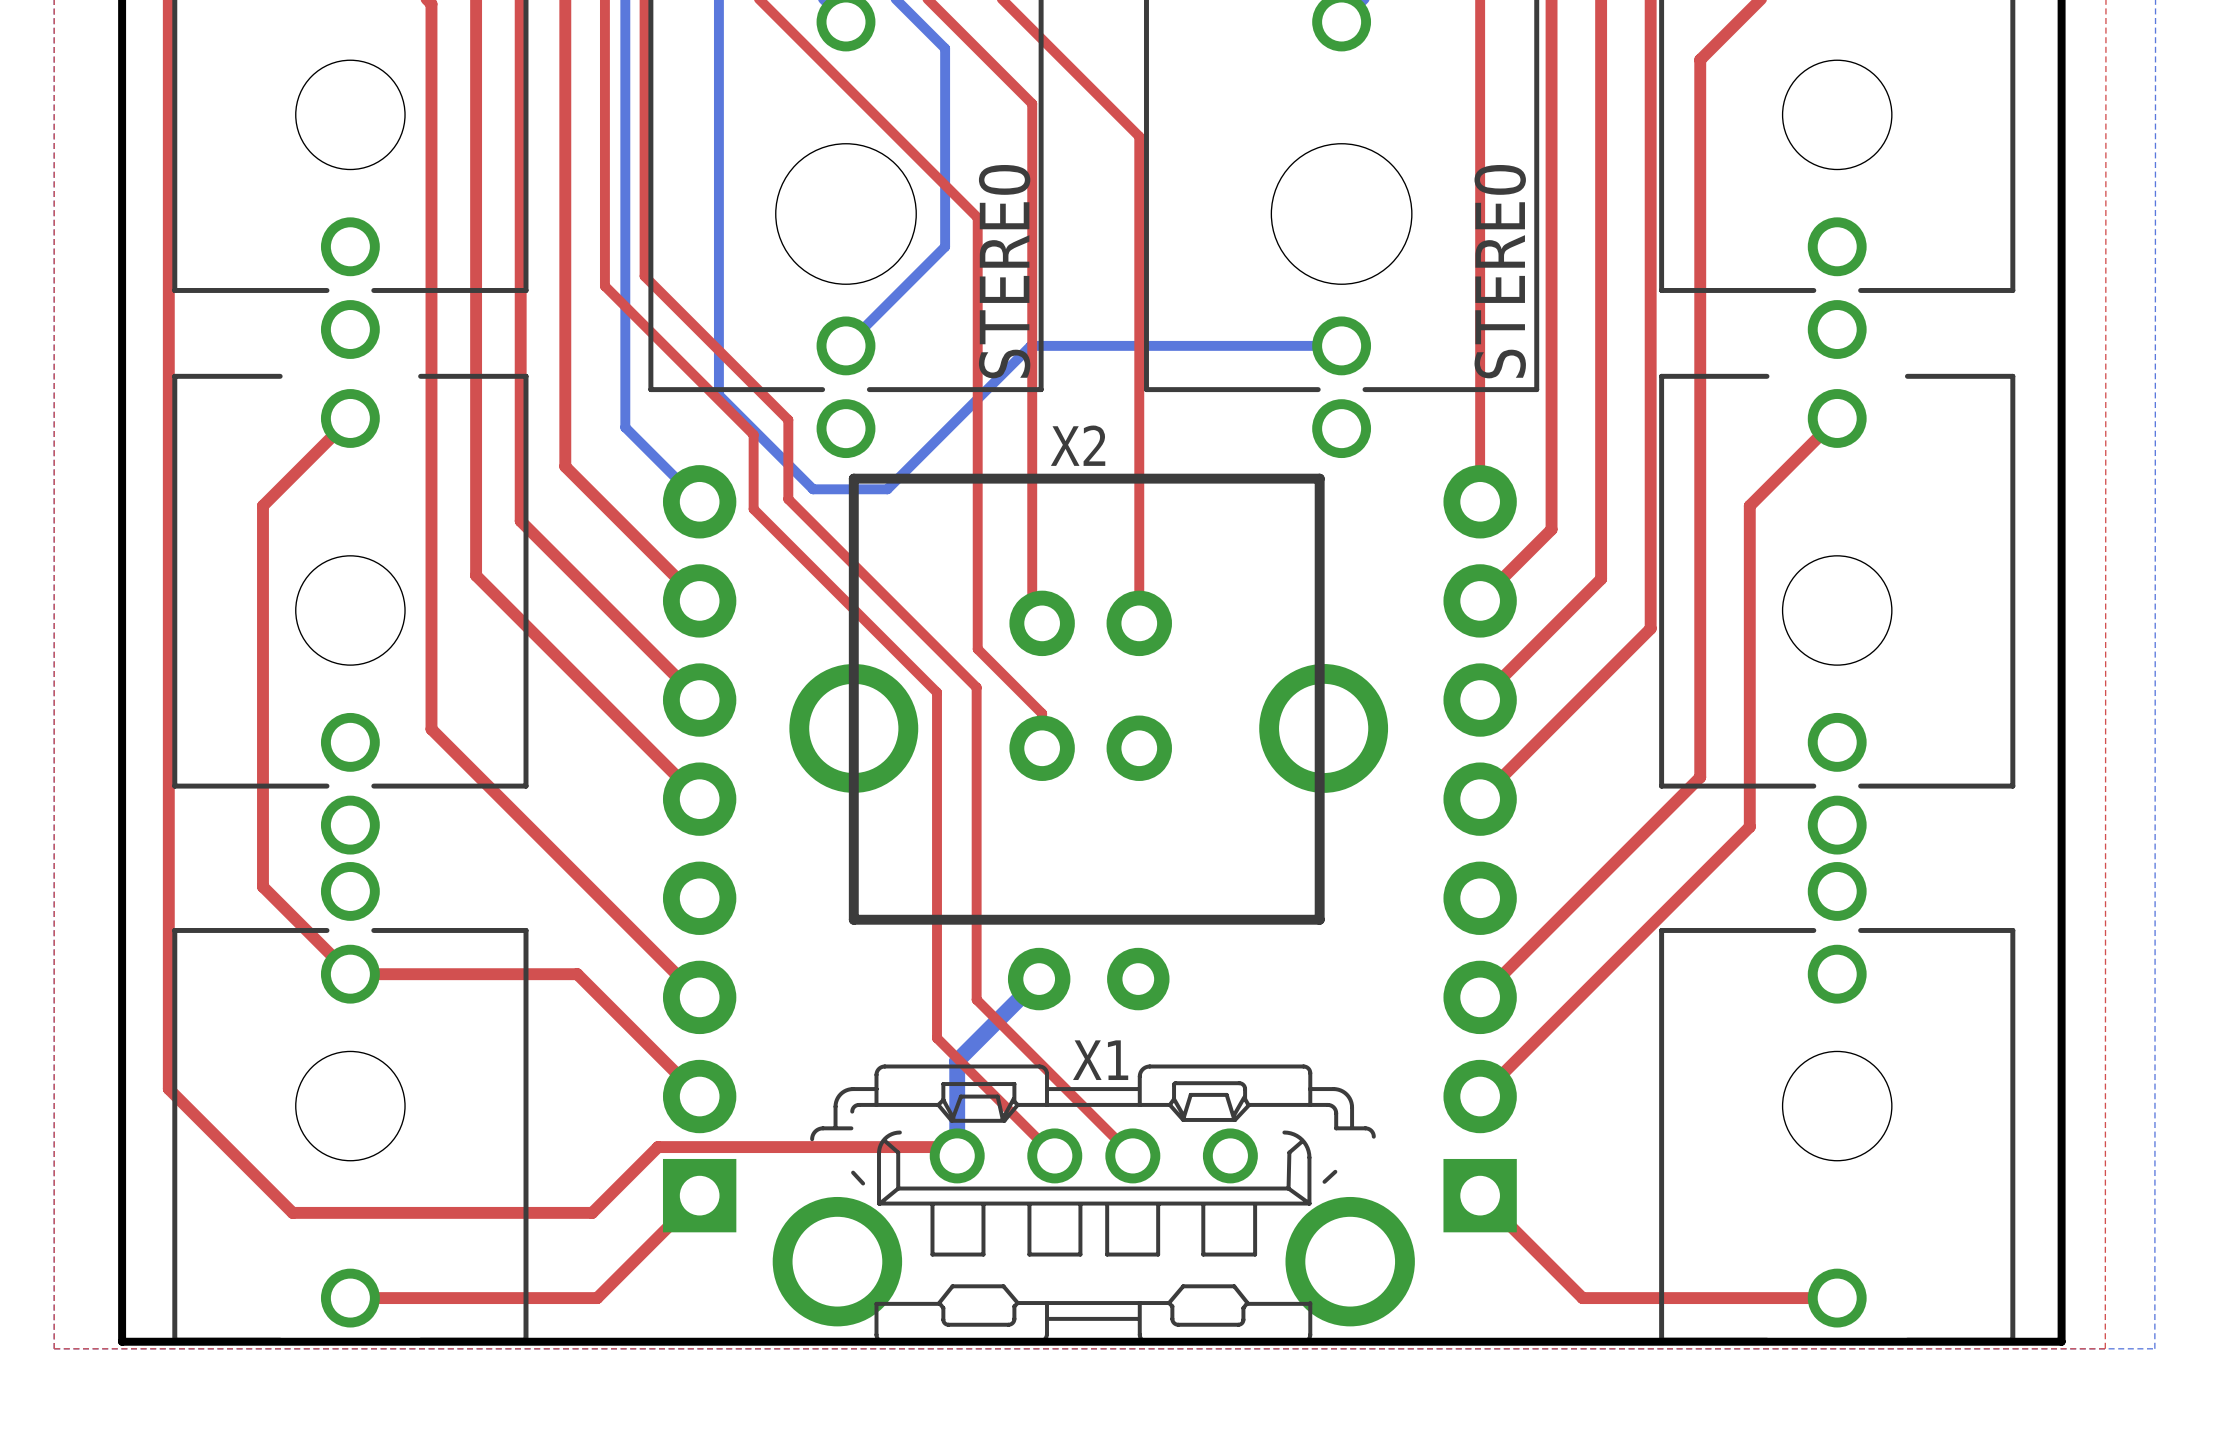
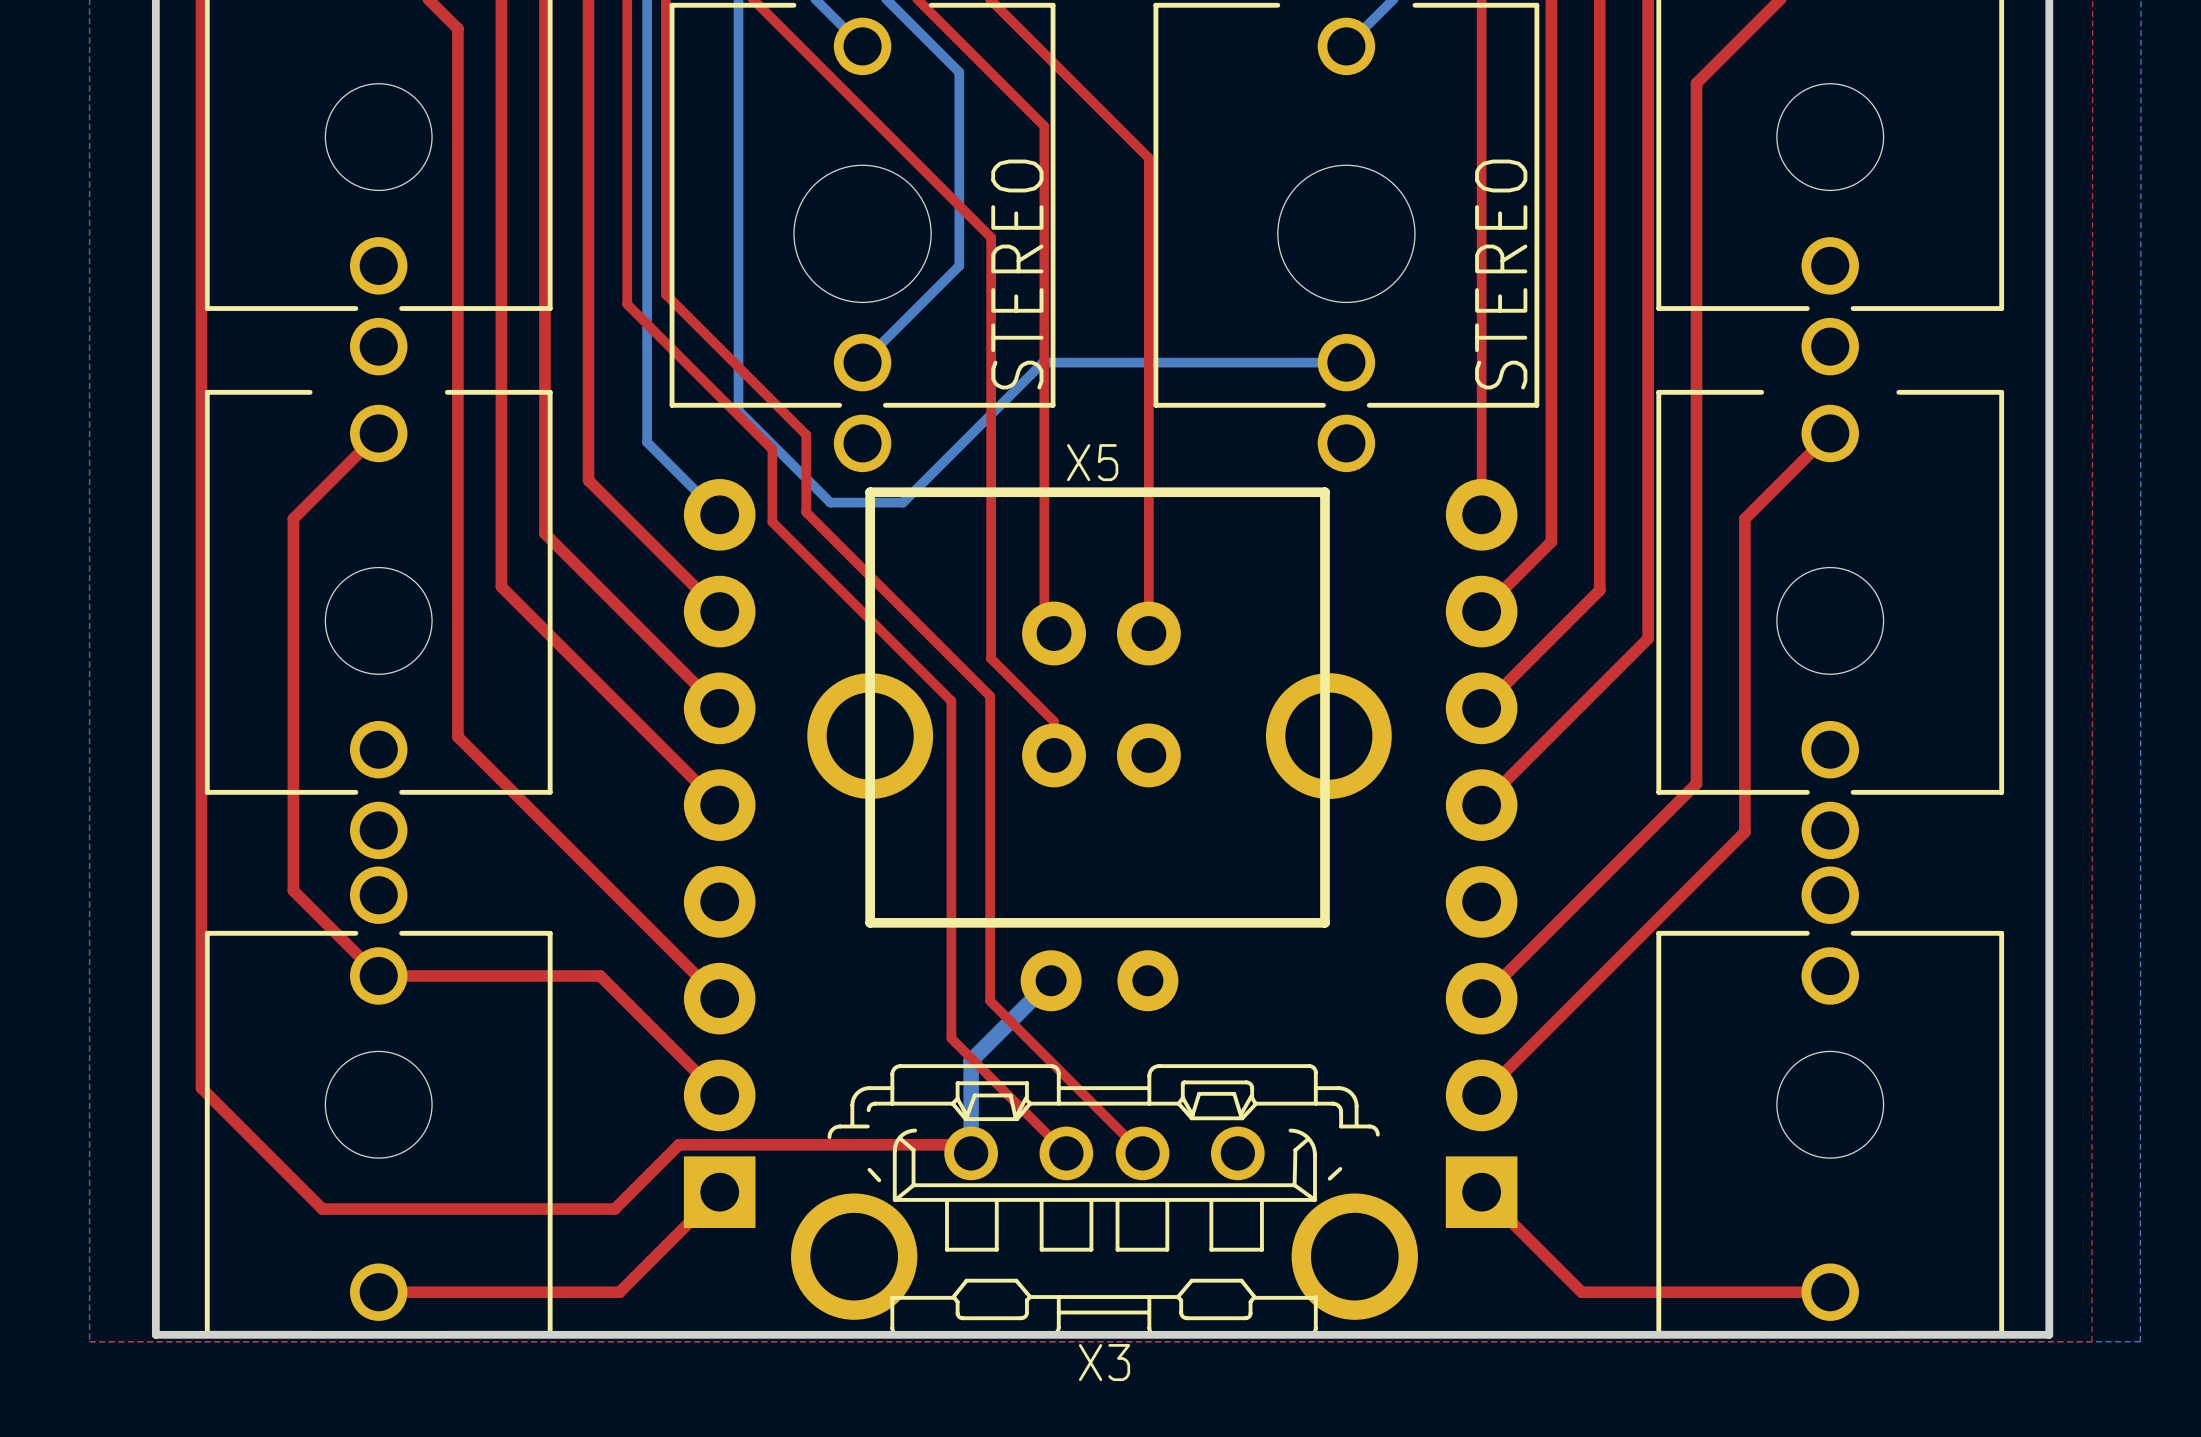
X2 name: X2 (1078, 445) -> X5 (1092, 462)
X1 name: X1 (1100, 1060) -> X3 (1104, 1362)

